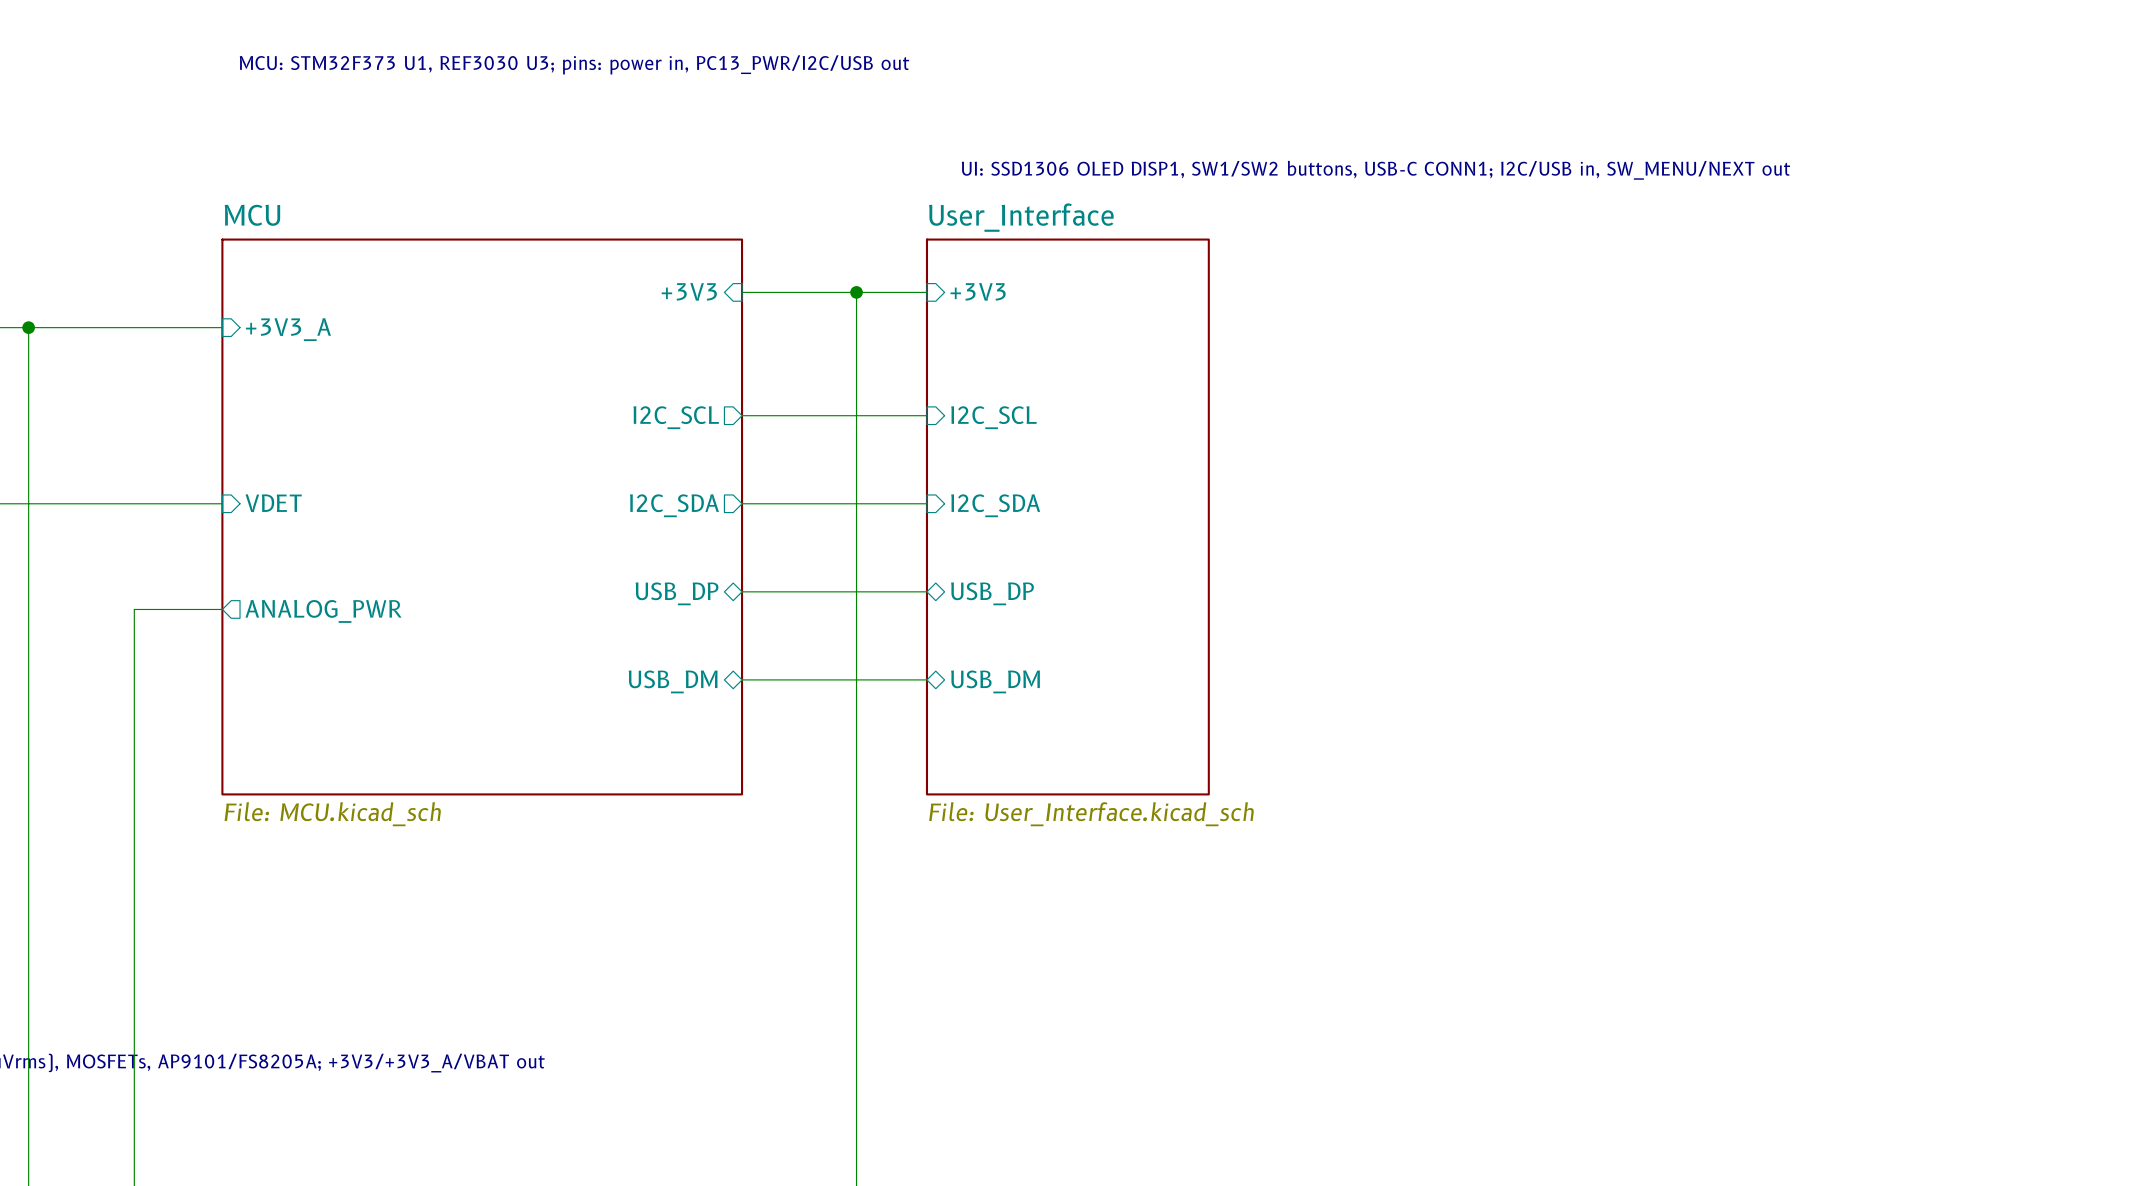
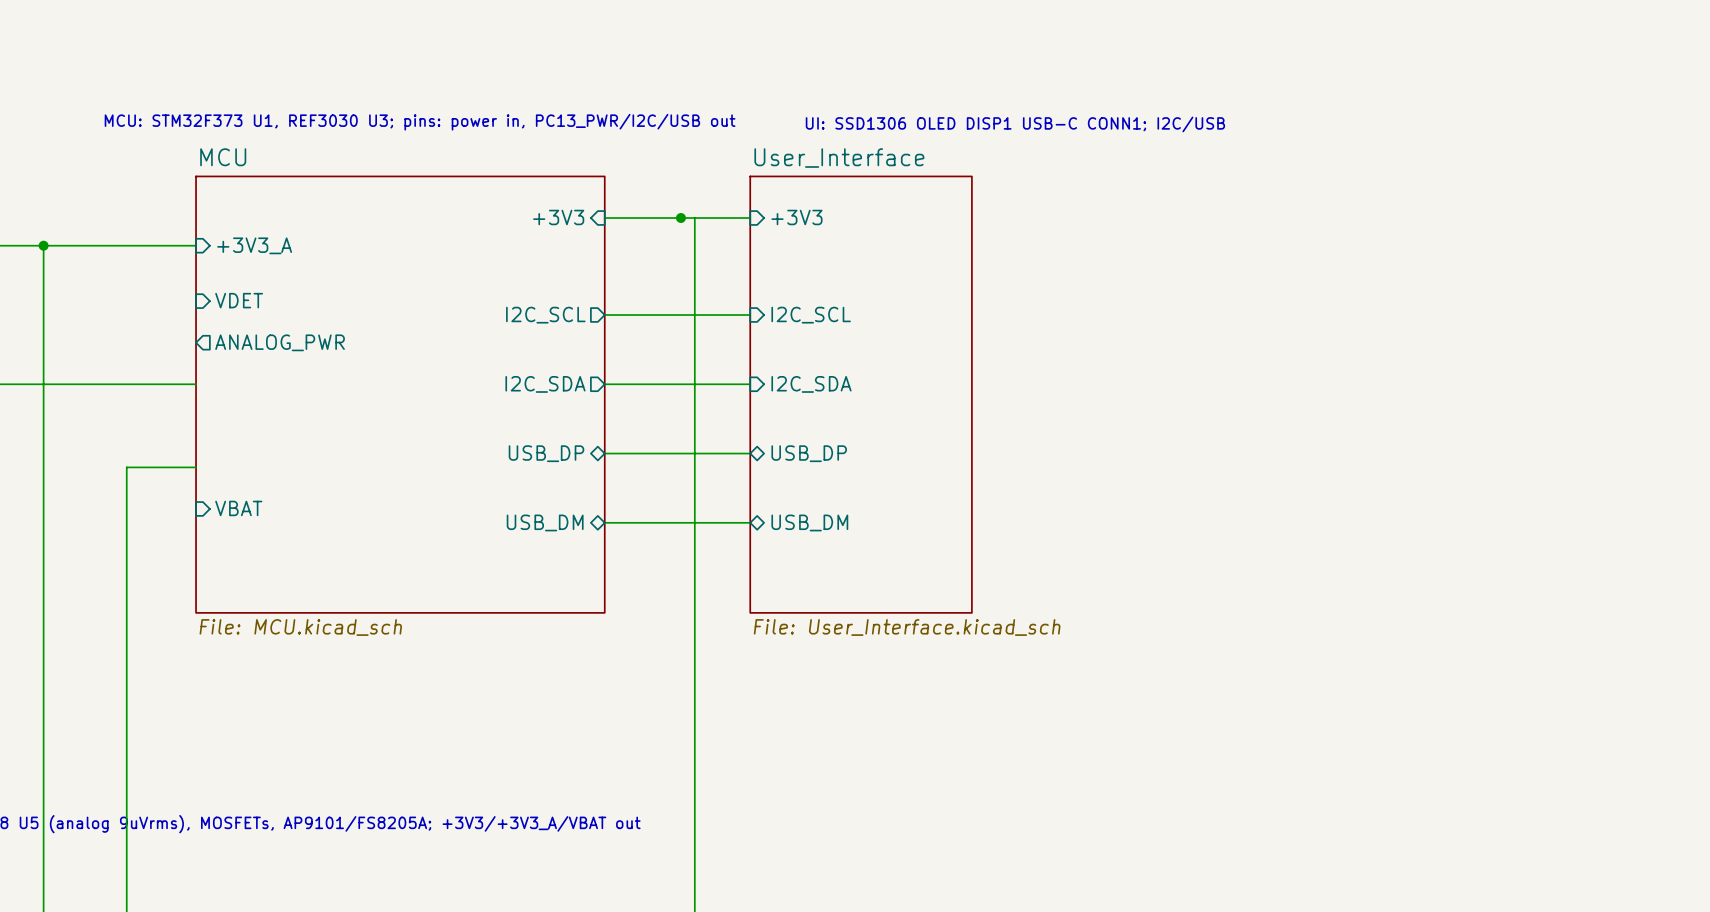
text position: MCU: STM32F373 U1, REF3030 U3; pins: power in, PC13_PWR/I2C/USB out (574, 64) -> MCU: STM32F373 U1, REF3030 U3; pins: power in, PC13_PWR/I2C/USB out (420, 122)
text: UI: SSD1306 OLED DISP1, SW1/SW2 buttons, USB-C CONN1; I2C/USB in, SW_MENU/NEXT out (1375, 170) -> UI: SSD1306 OLED DISP1 USB-C CONN1; I2C/USB (1015, 124)
junction position: (856, 292) -> (680, 218)
sheet pin position: VDET (273, 503) -> VDET (239, 300)
sheet pin position: ANALOG_PWR (323, 611) -> ANALOG_PWR (280, 342)
sheet pin: none -> VBAT (238, 508)

